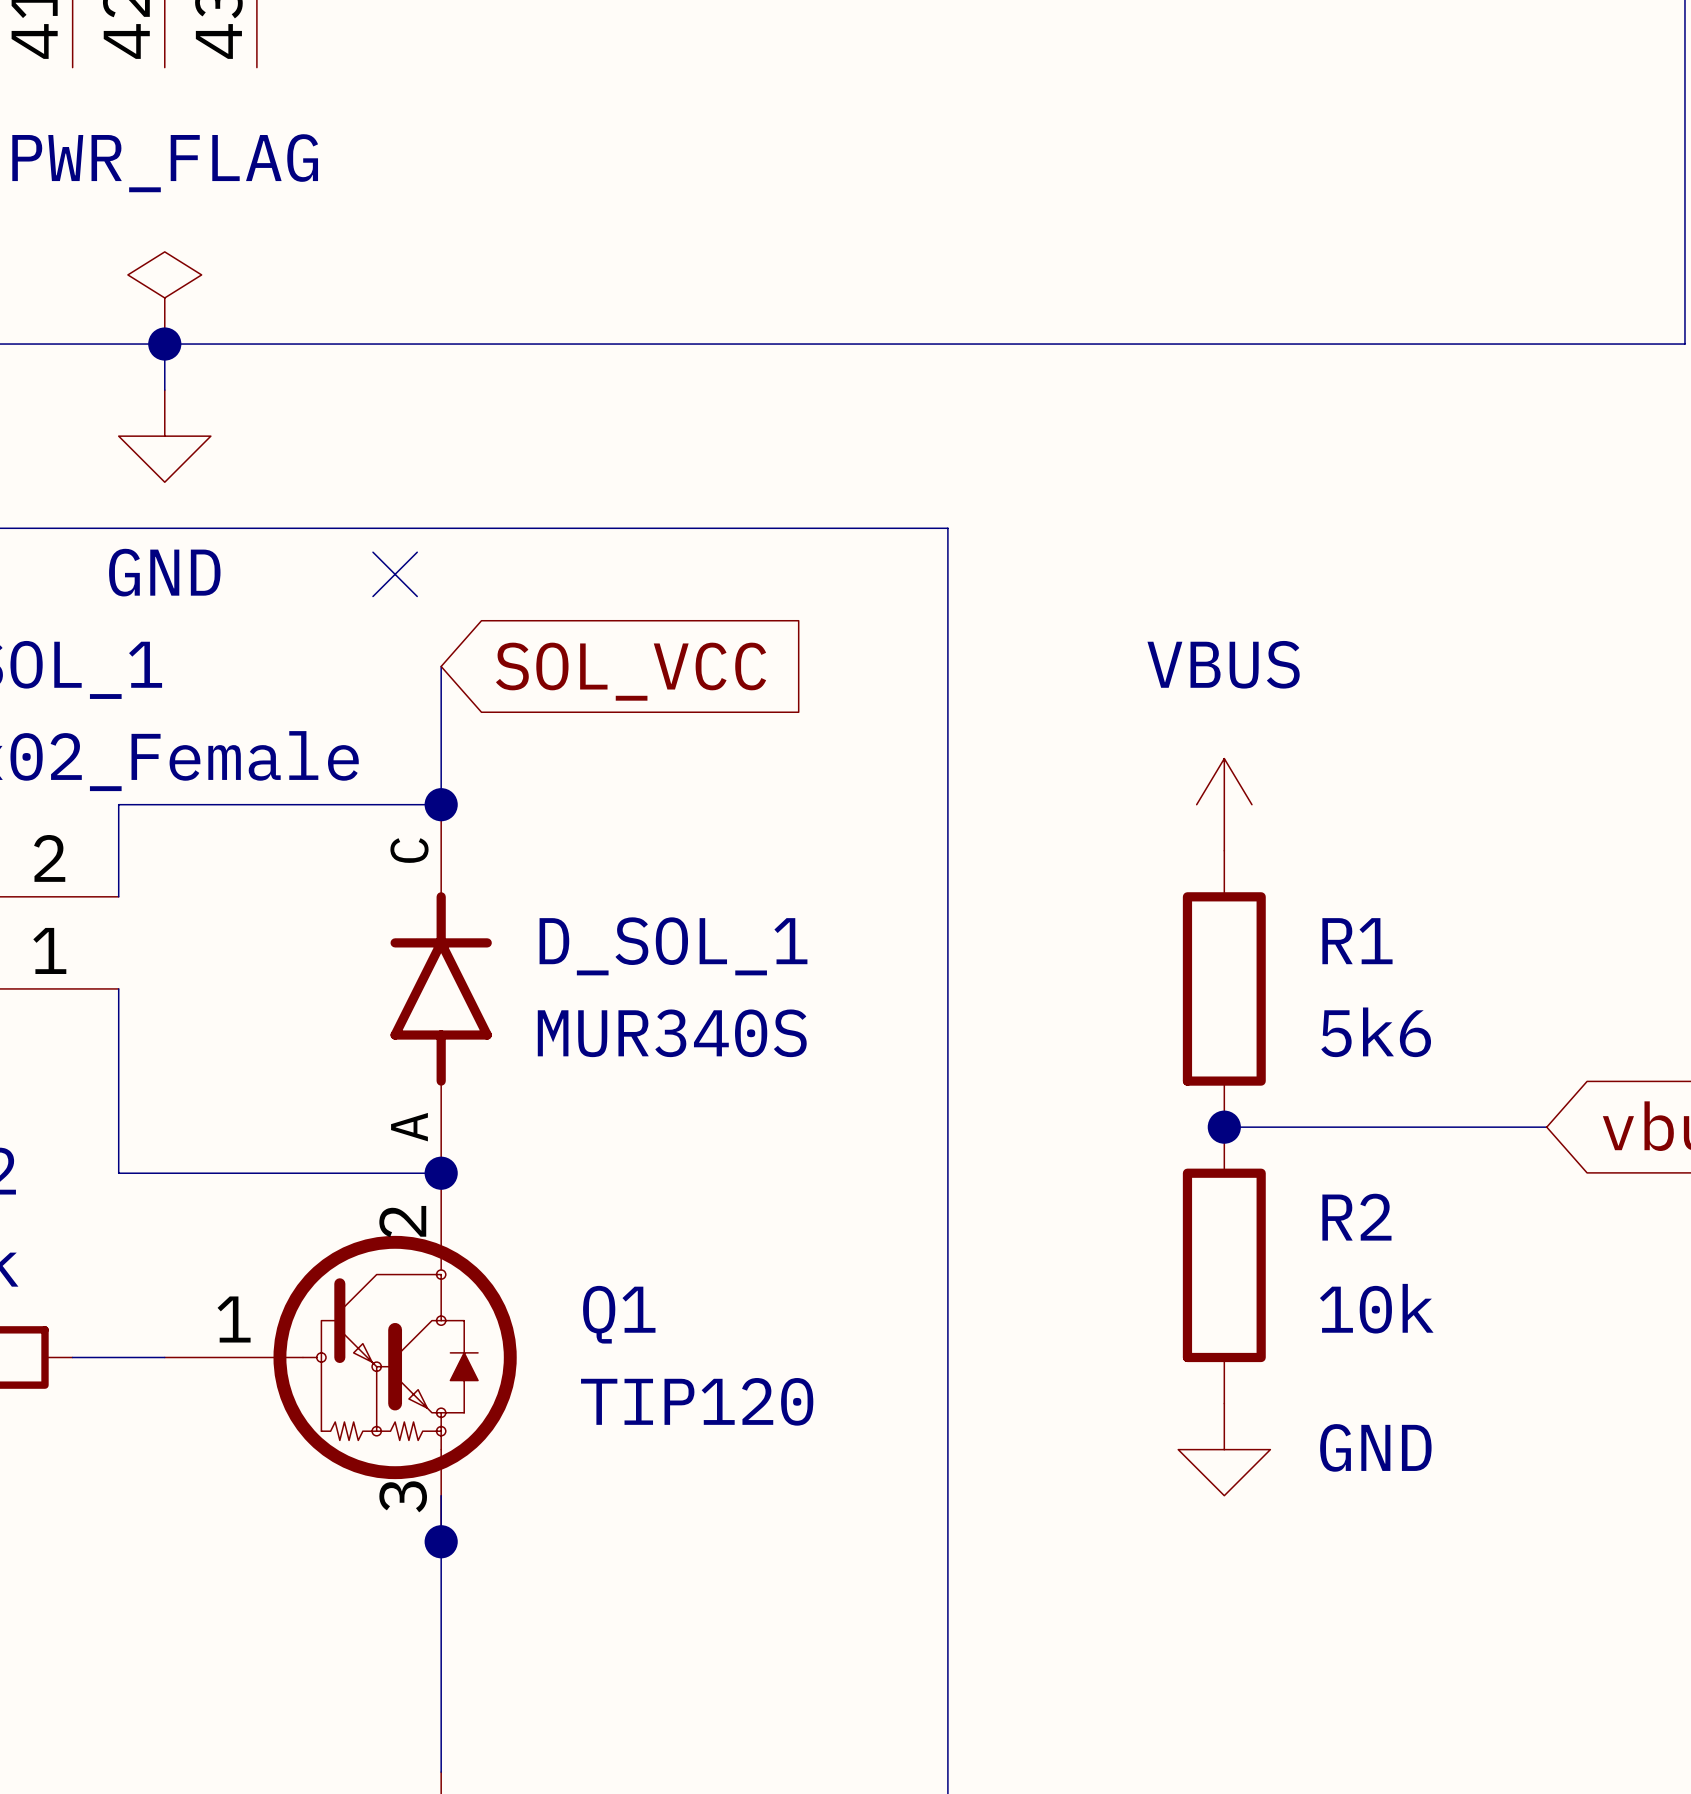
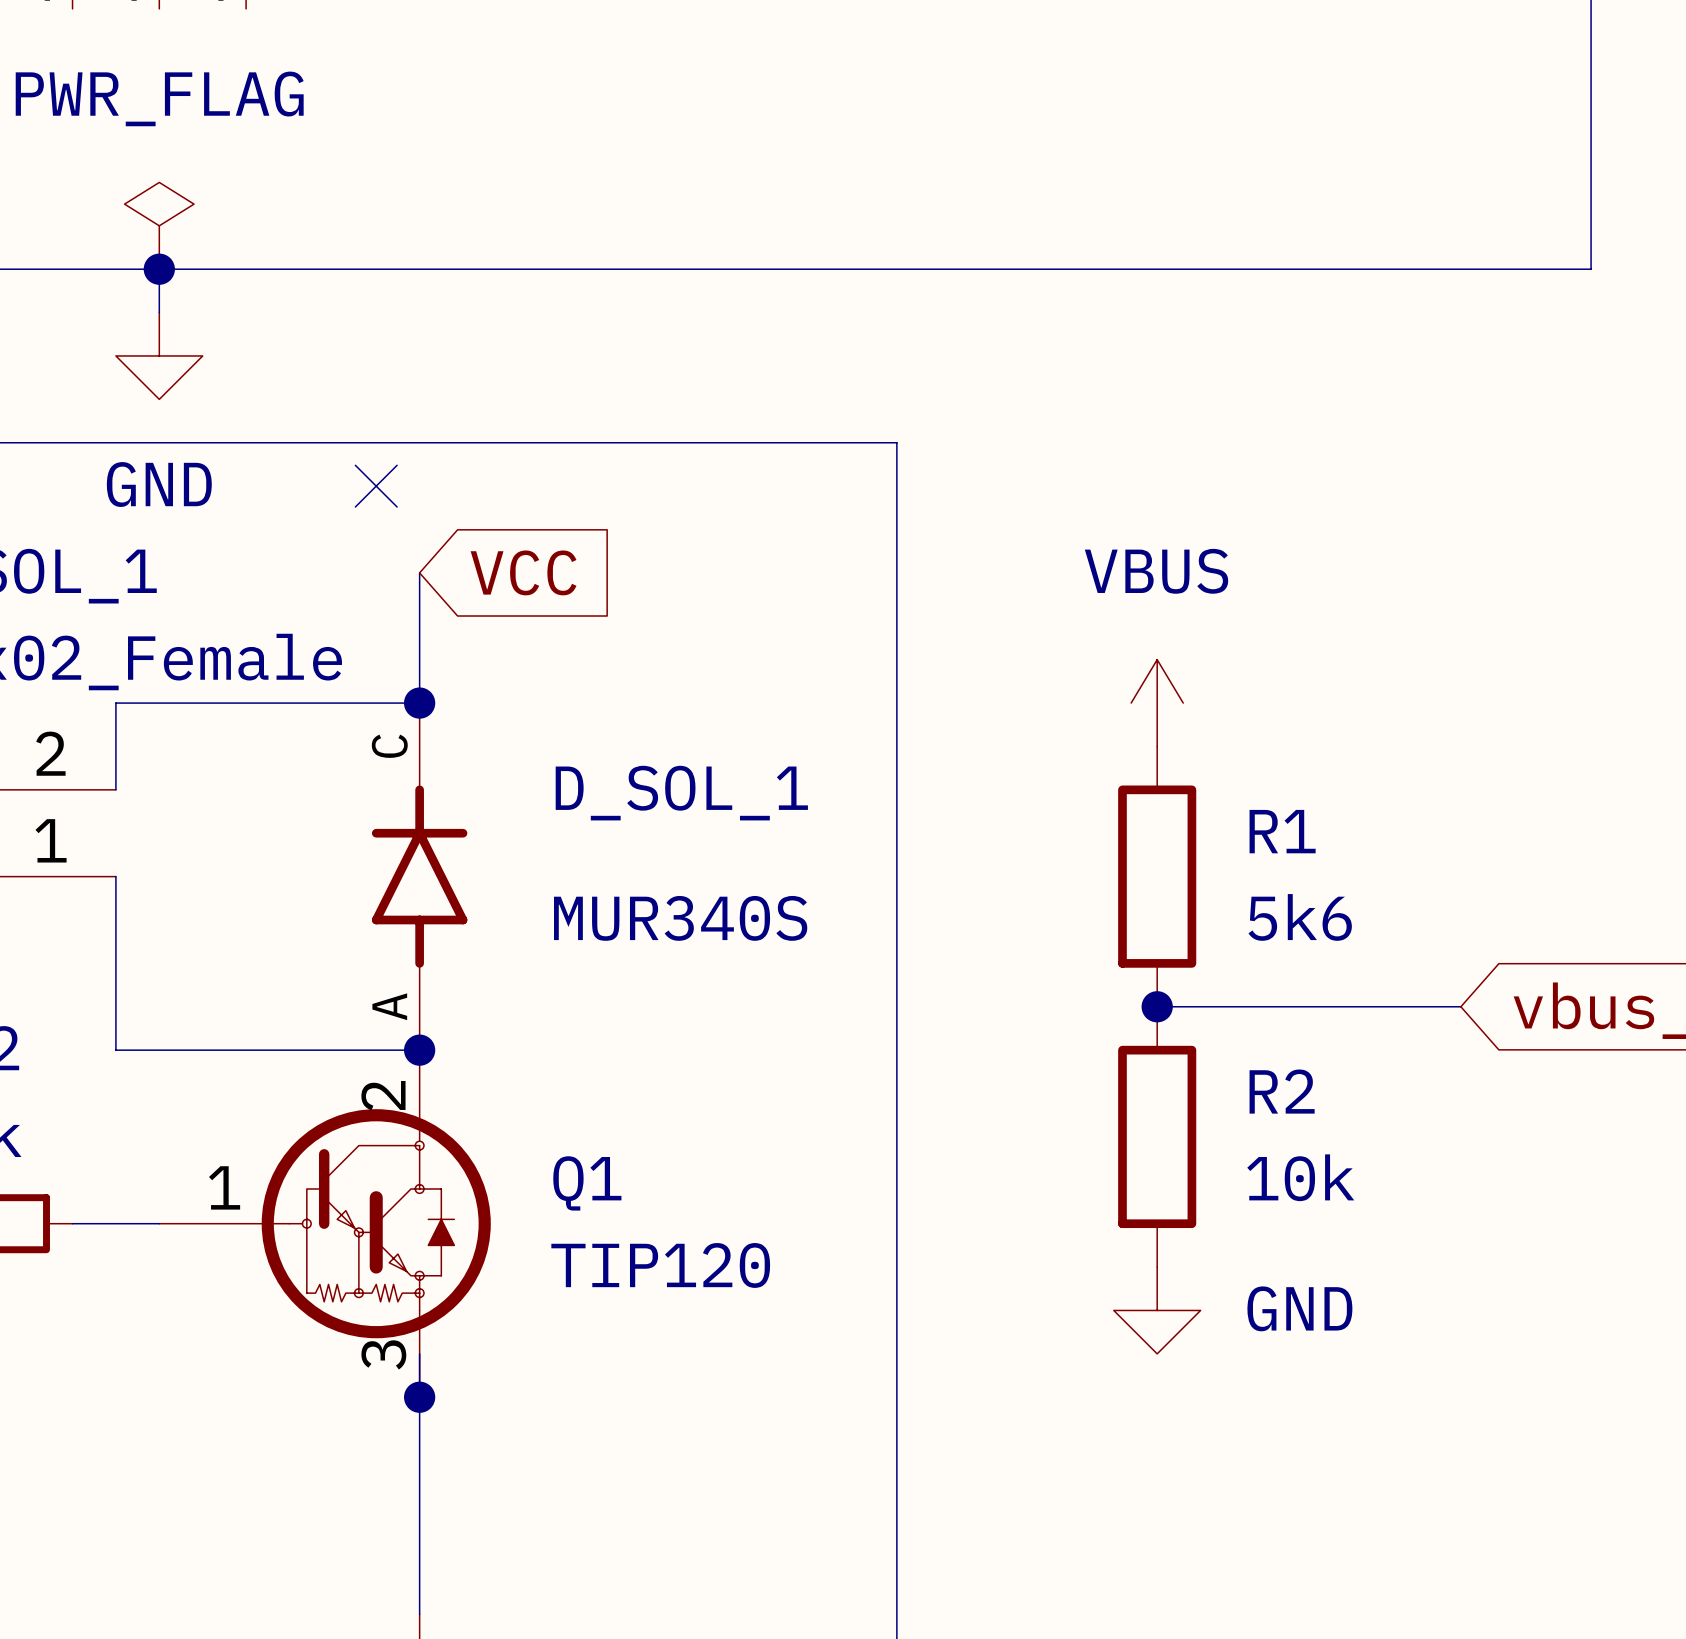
global label: SOL_VCC (631, 671) -> VCC (523, 572)
D_SOL_1 name position: D_SOL_1 (673, 946) -> D_SOL_1 (681, 793)
D_SOL_1 value position: MUR340S (672, 1033) -> MUR340S (680, 918)

